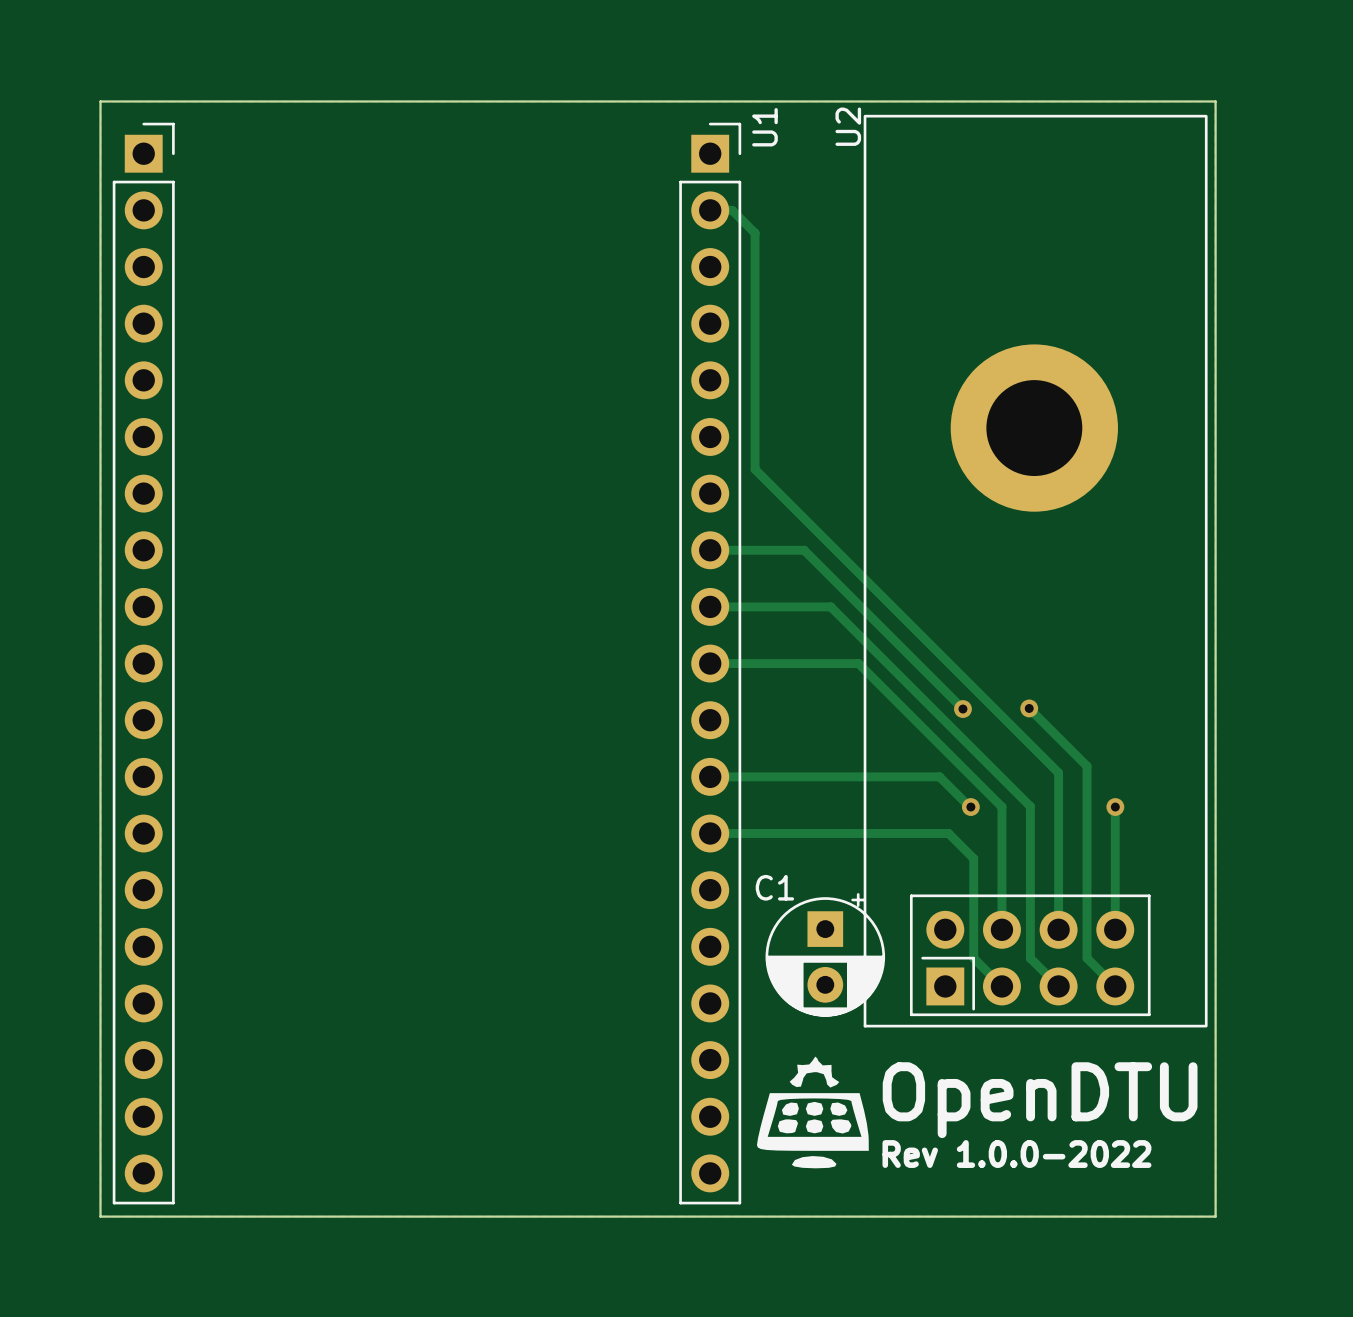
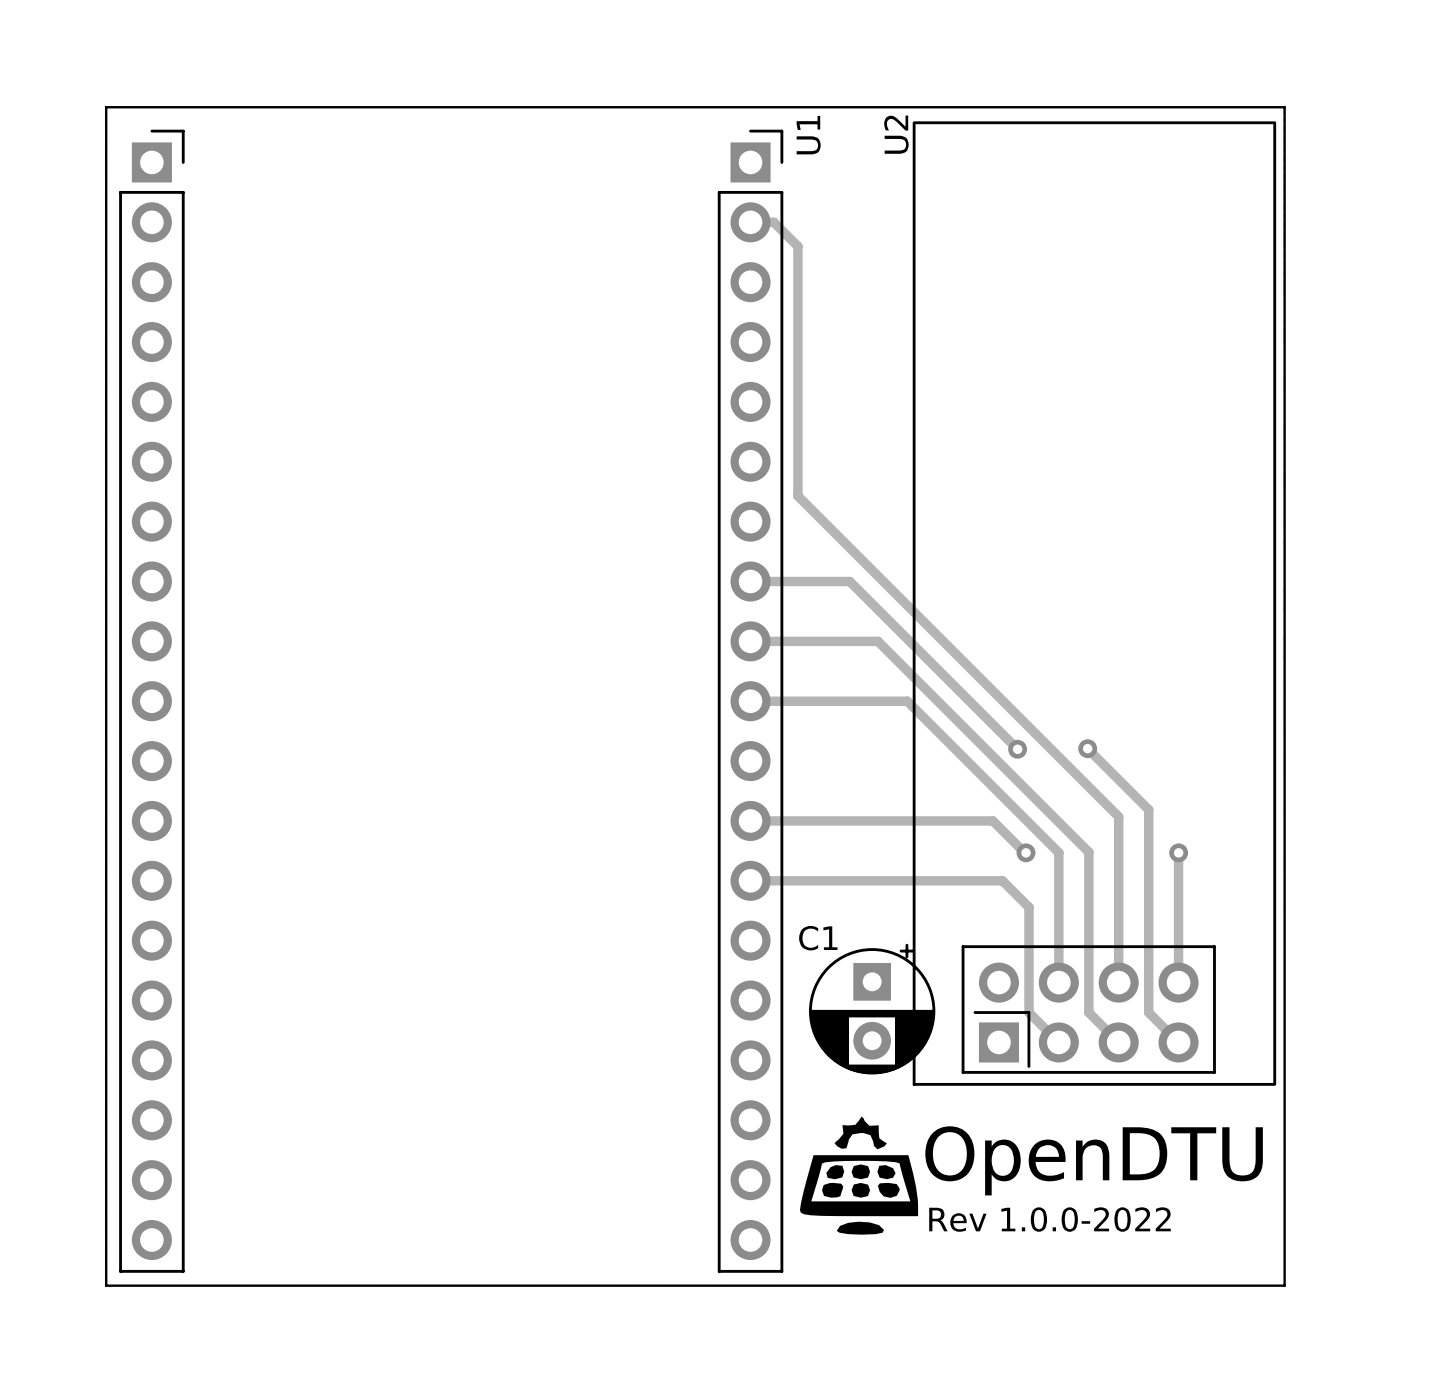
part: (1034, 428) -> none

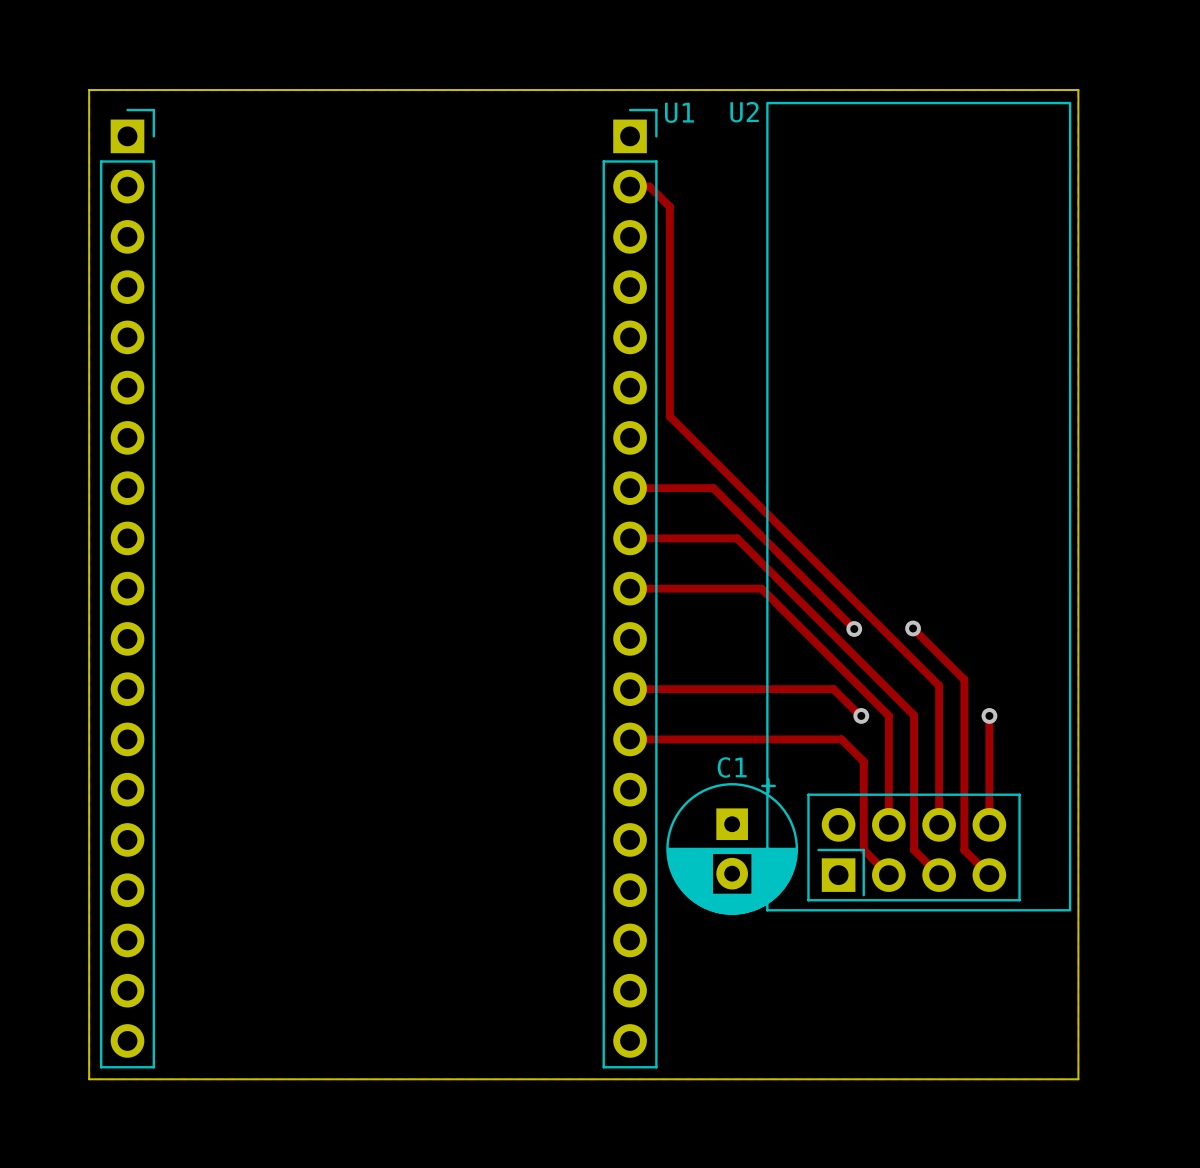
U2 name rotation: 0° (896, 134) -> 90° clockwise (744, 112)
U1 name rotation: 0° (808, 135) -> 90° clockwise (679, 112)
C1 name position: C1 (818, 938) -> C1 (732, 767)
C1 footprint: [808, 943, 936, 1075] -> [666, 778, 799, 915]
drawing: [799, 1116, 919, 1235] -> none
text: OpenDTU (1094, 1160) -> none
text: Rev 1.0.0-2022 (1049, 1219) -> none

